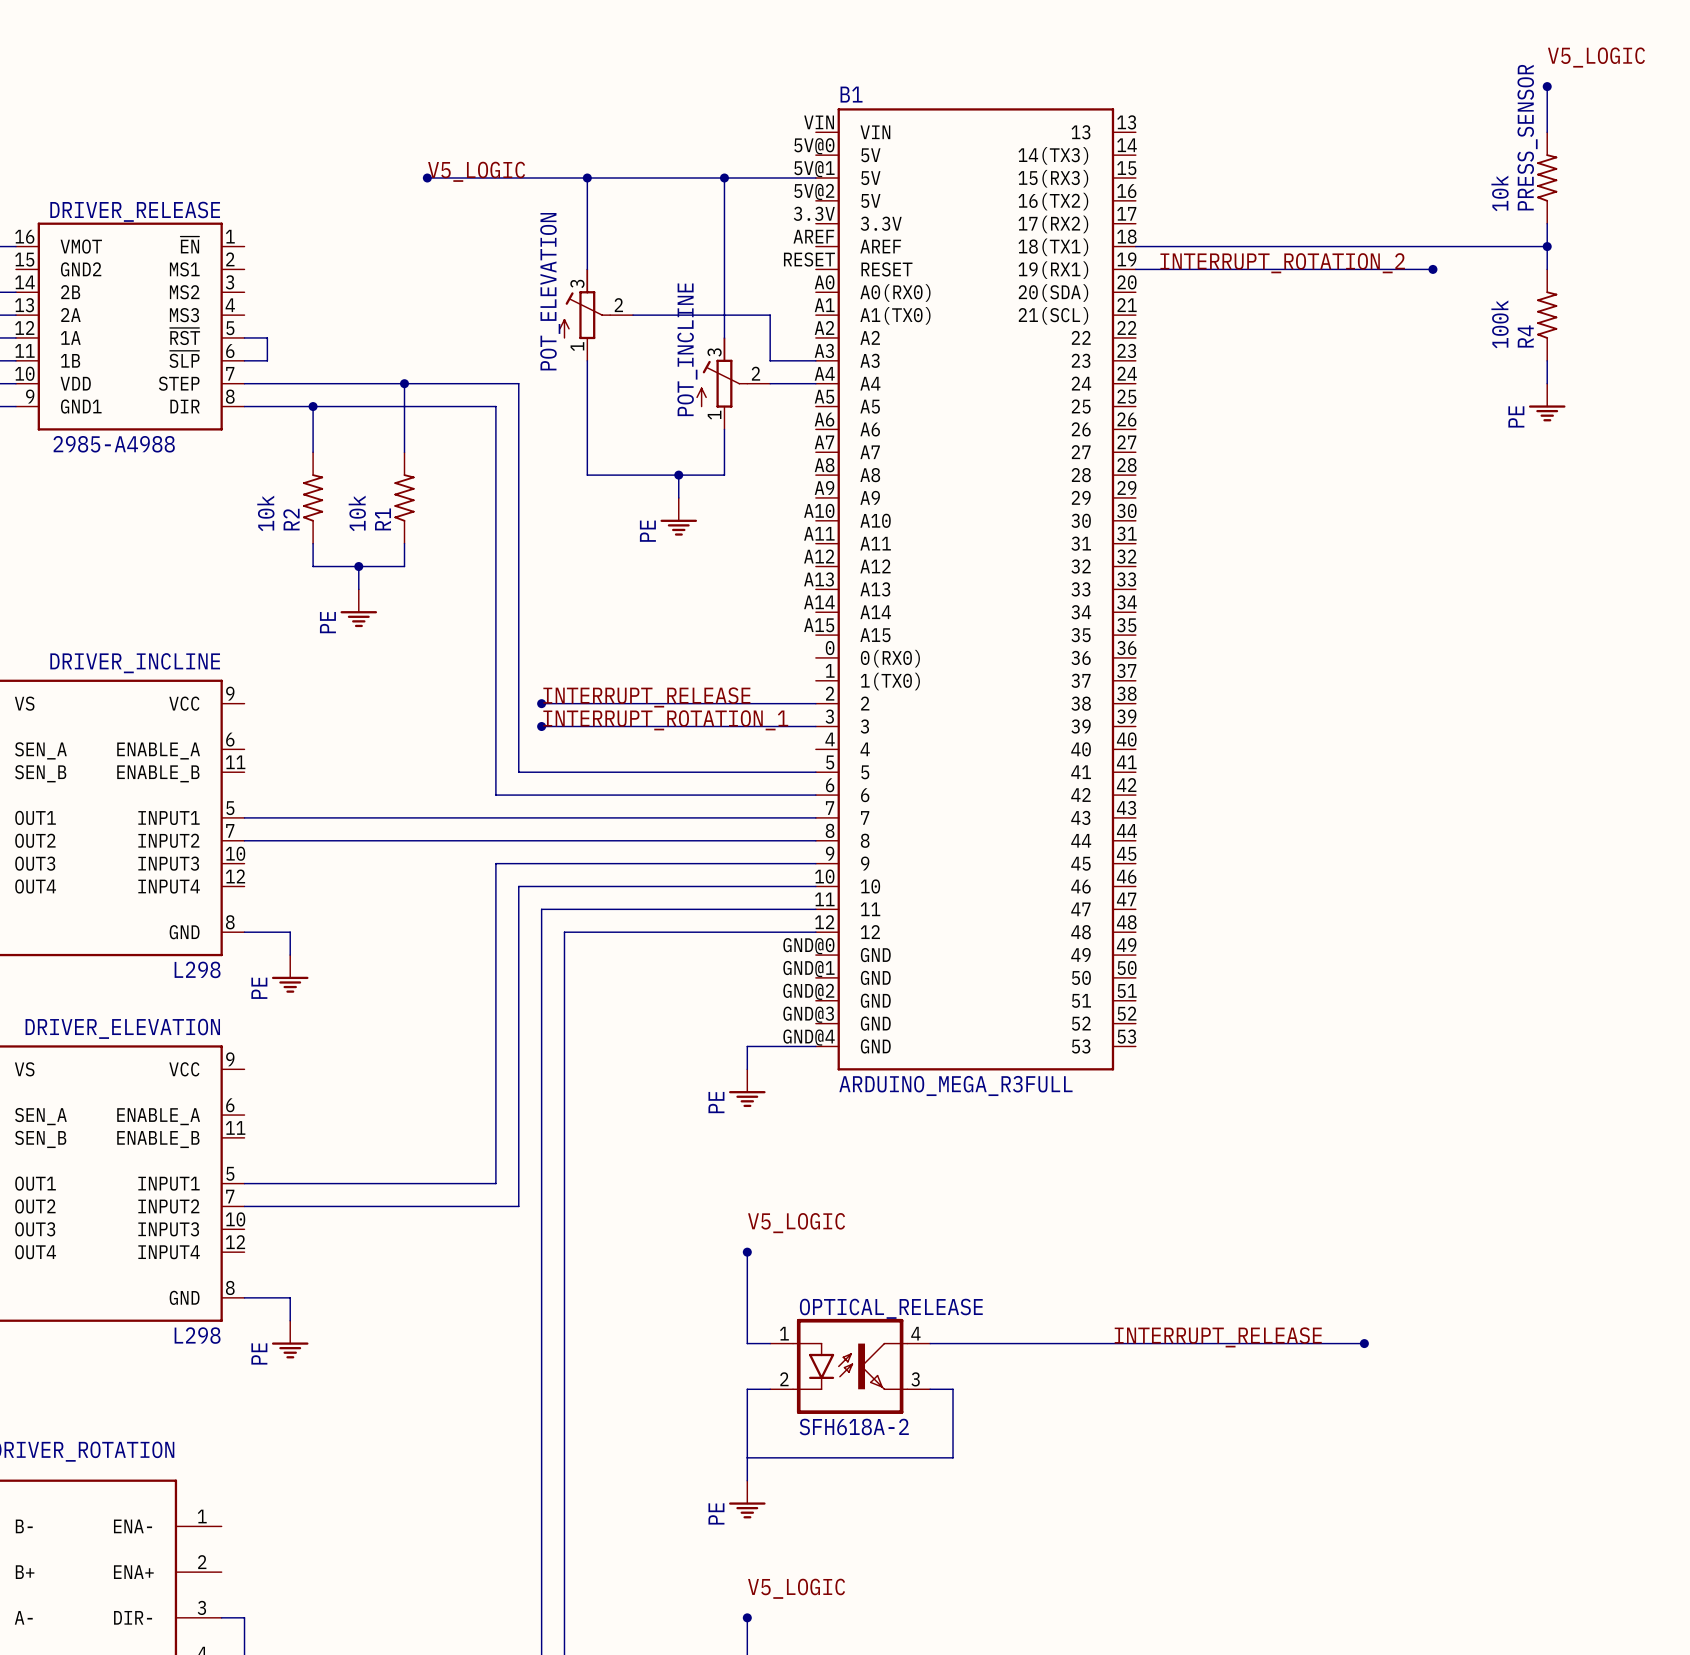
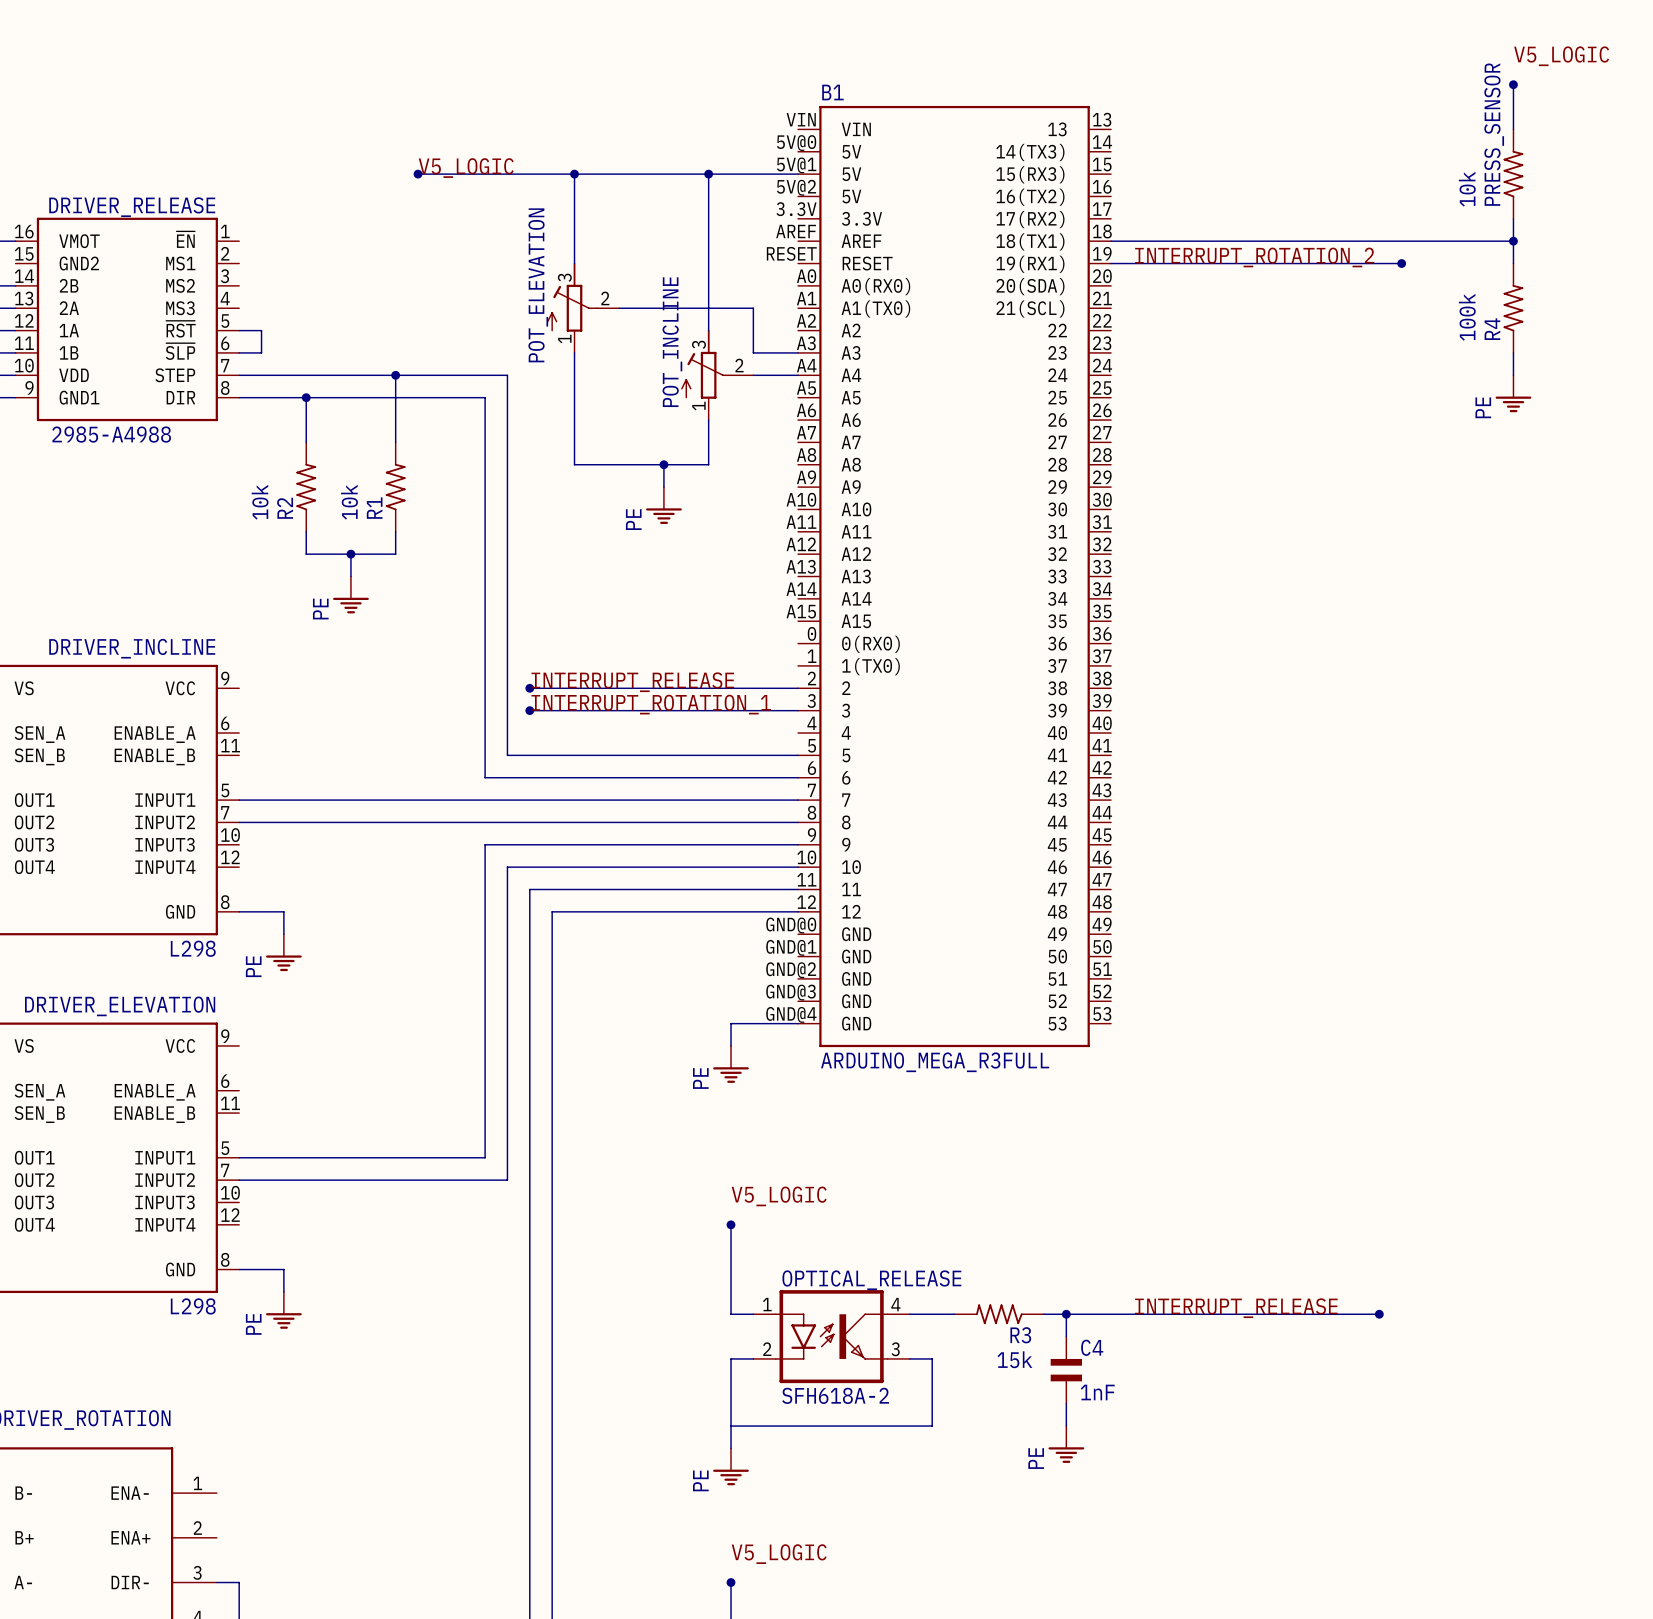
label position: INTERRUPT_RELEASE (1218, 1337) -> INTERRUPT_RELEASE (1236, 1308)
R3: none -> 15k (999, 1314)
wire: none -> (1066, 1314) (1066, 1336)
junction: none -> (1066, 1314)
wire: none -> (1334, 1314) (1379, 1314)
junction position: (1364, 1343) -> (1379, 1314)
C4: none -> 1nF (1066, 1370)
wire: none -> (1066, 1403) (1066, 1426)
power symbol: none -> PE (1066, 1444)

